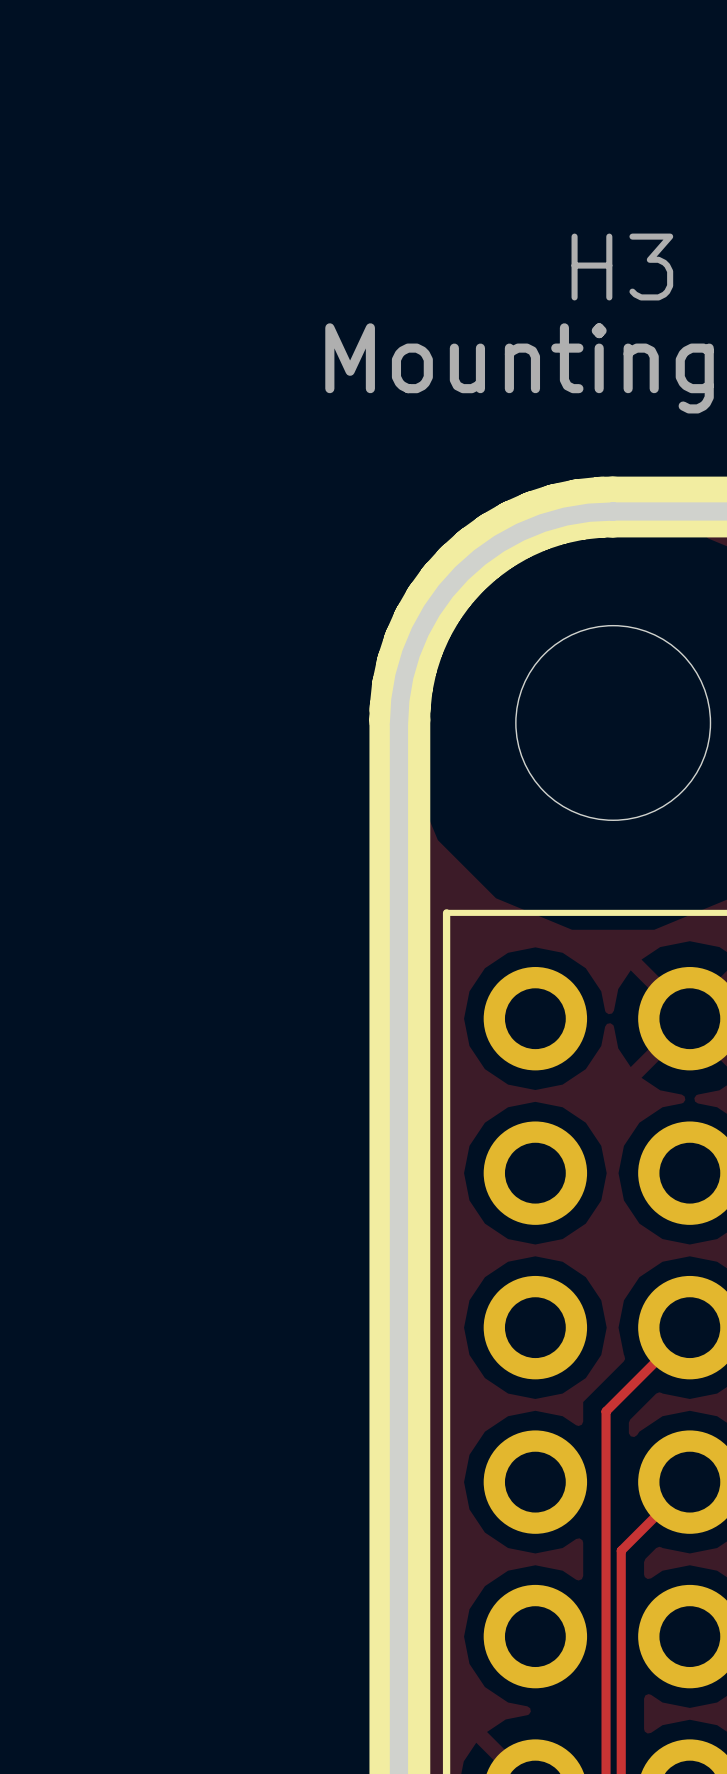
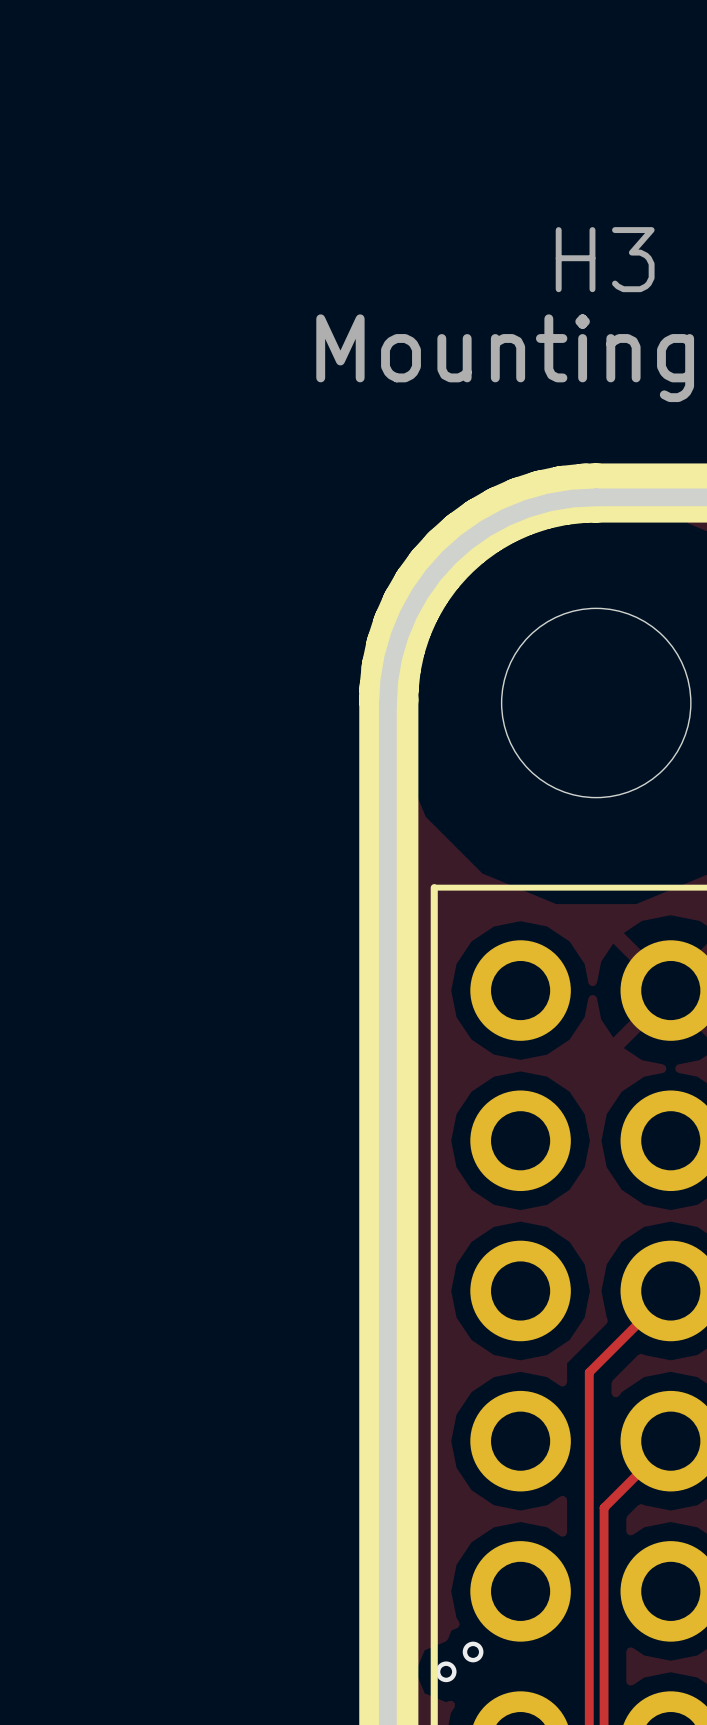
via: none -> (473, 1652)
via: none -> (446, 1671)

